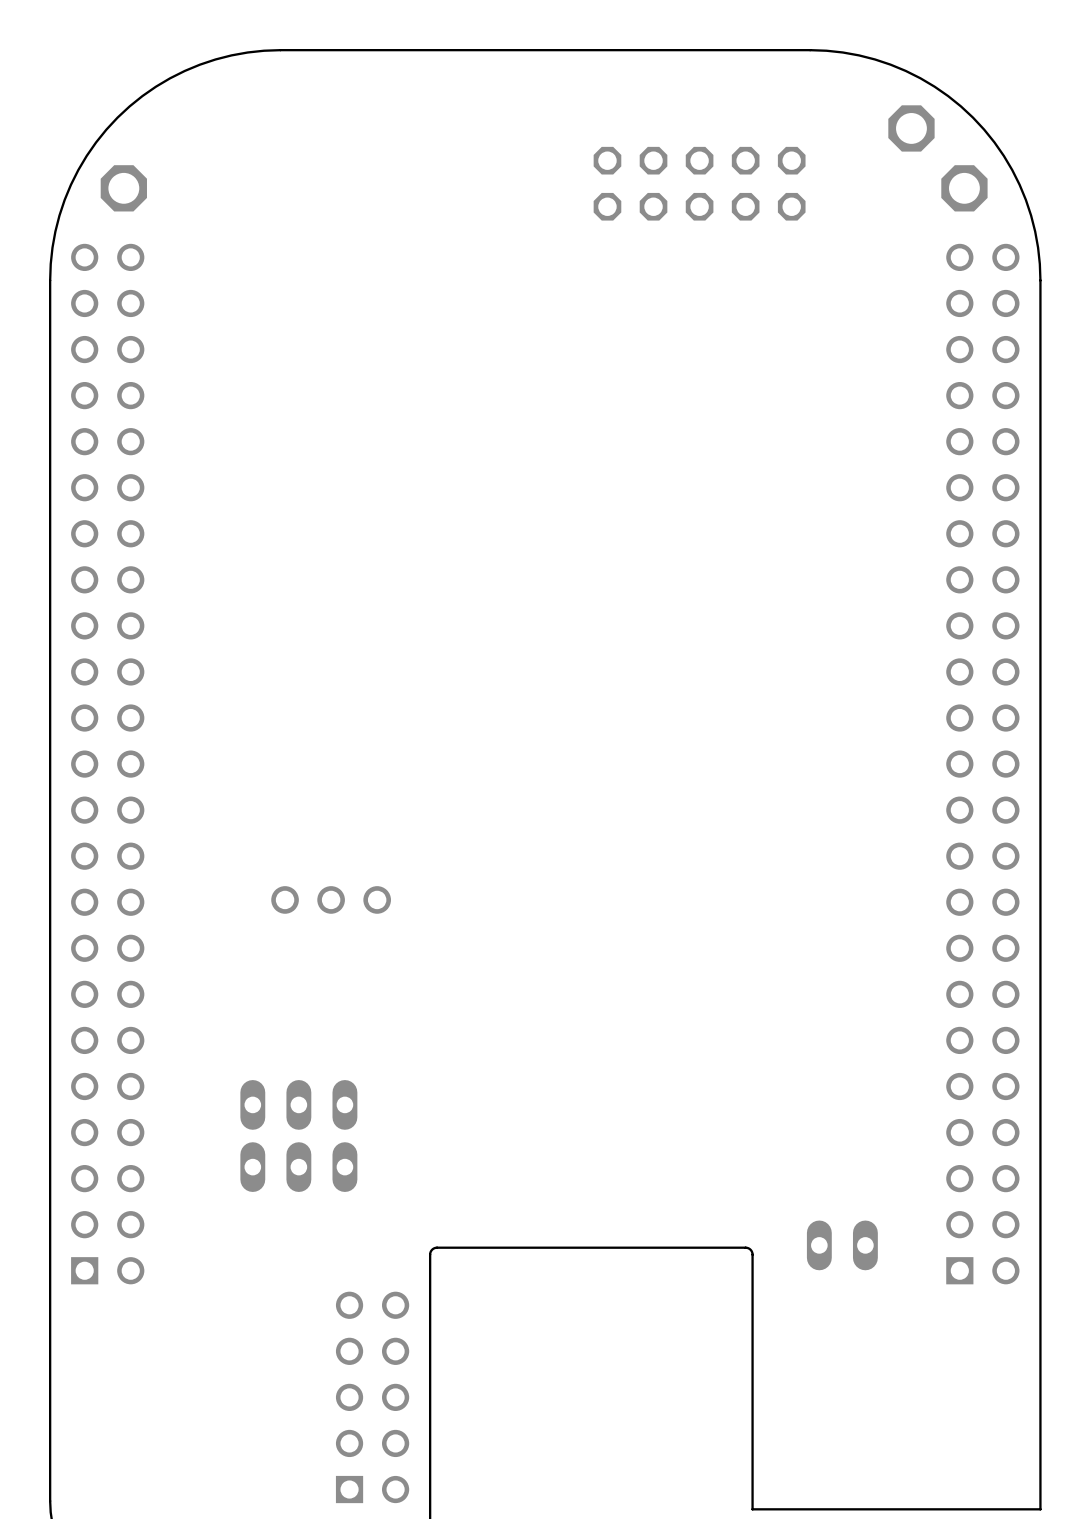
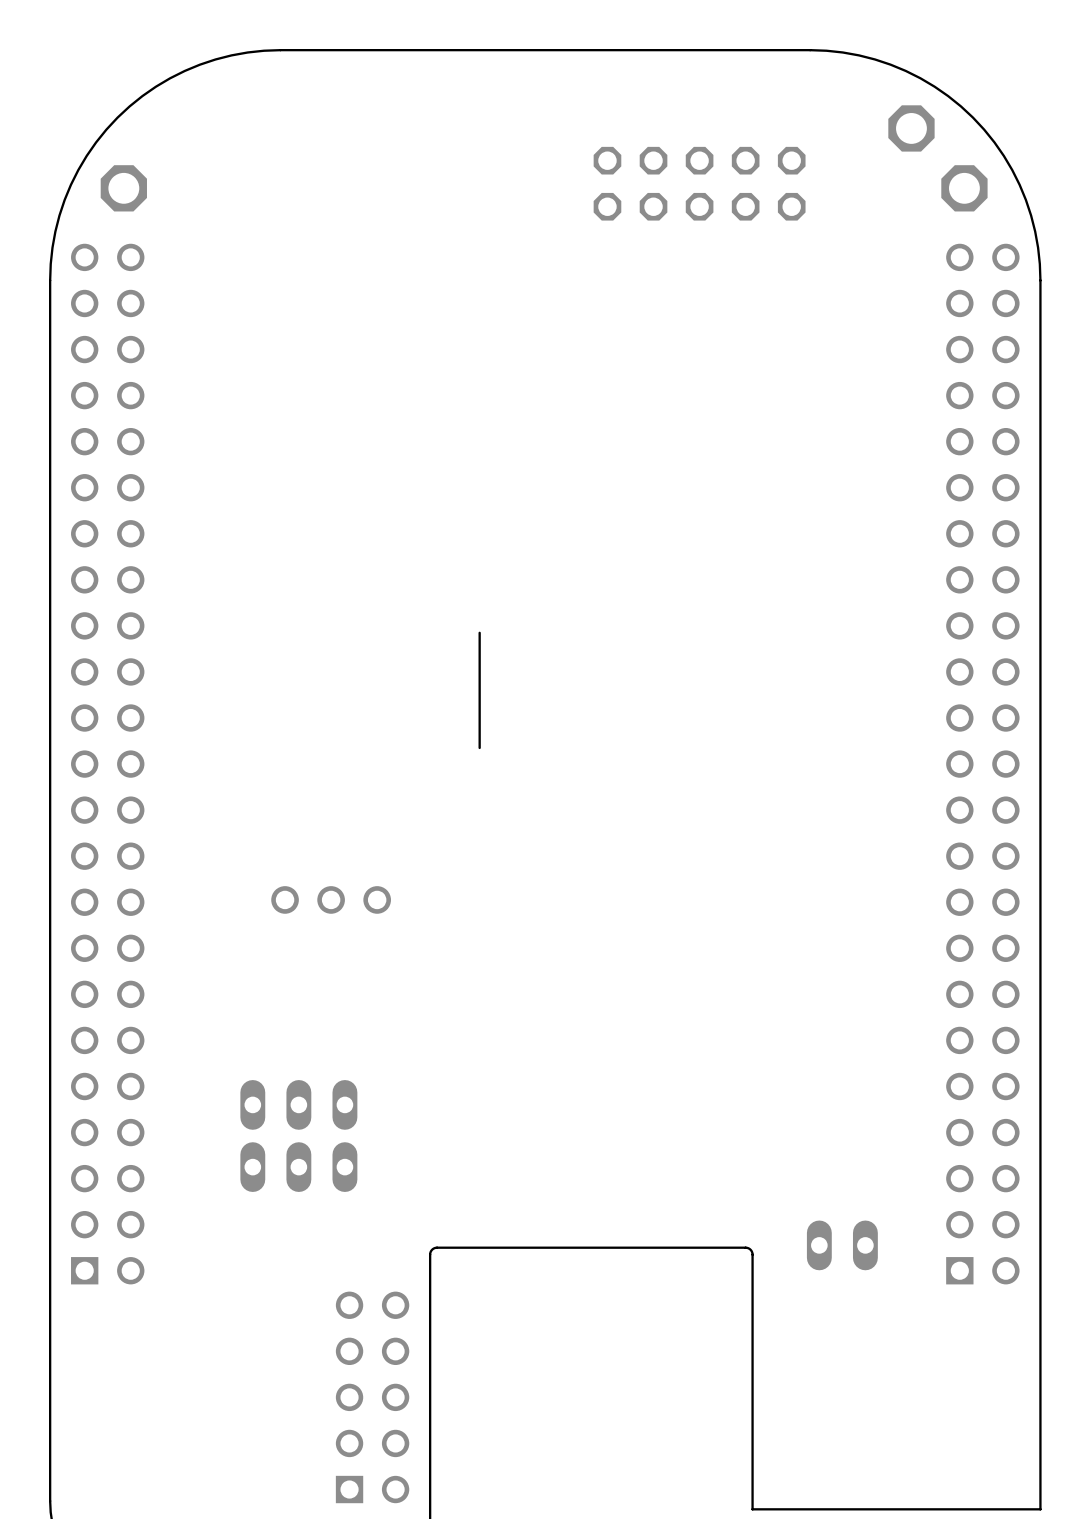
part: none -> (479, 690)

